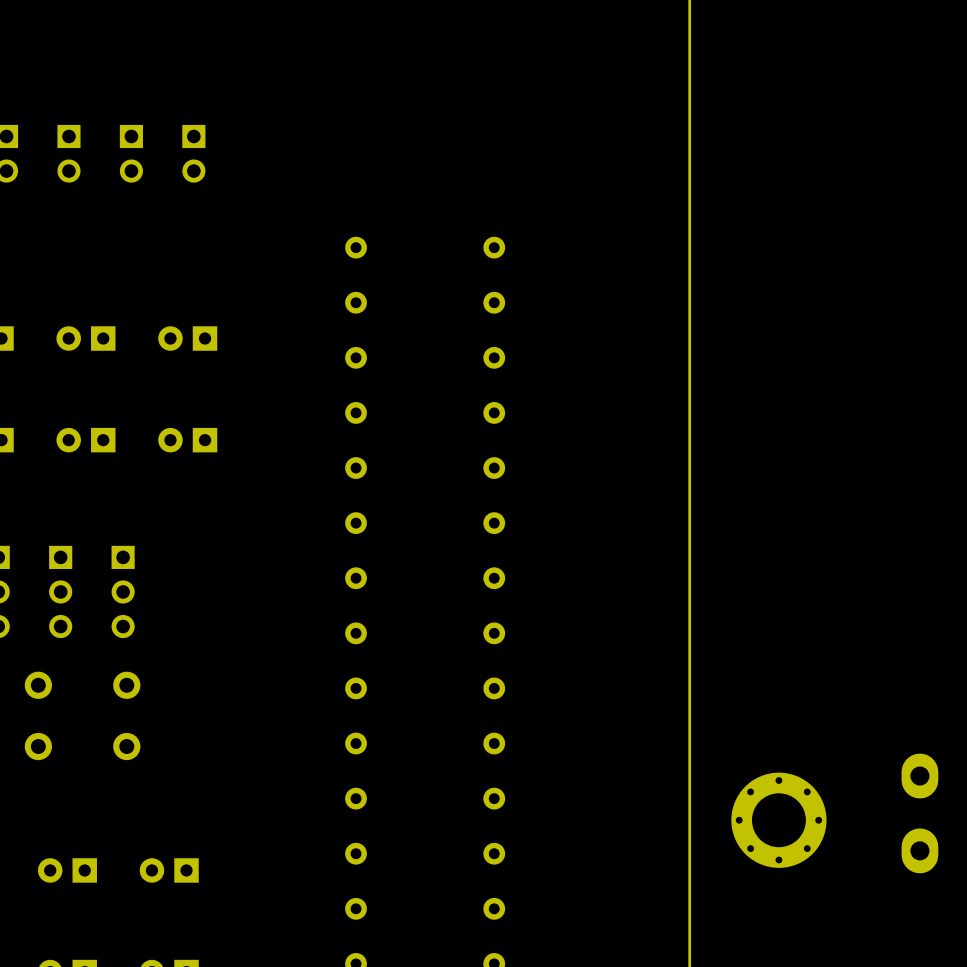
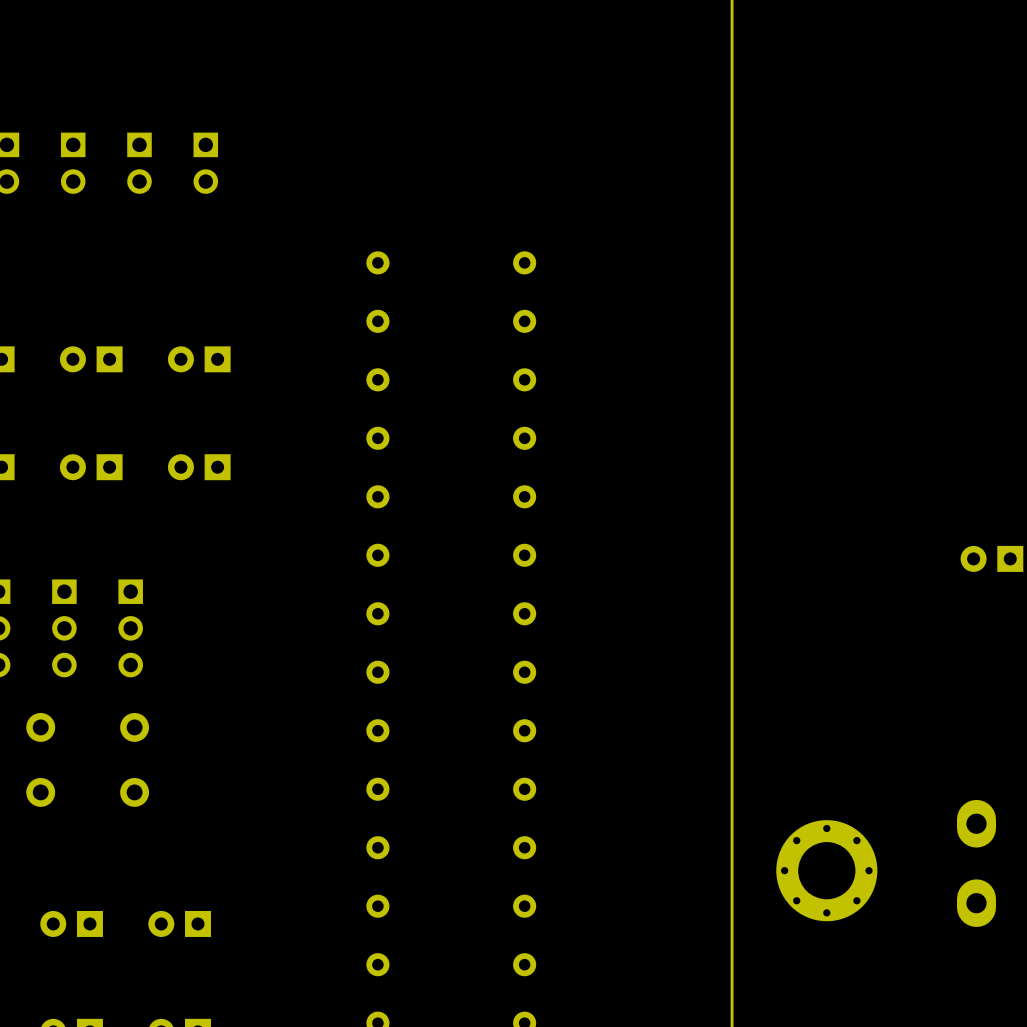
part: none -> (991, 558)

